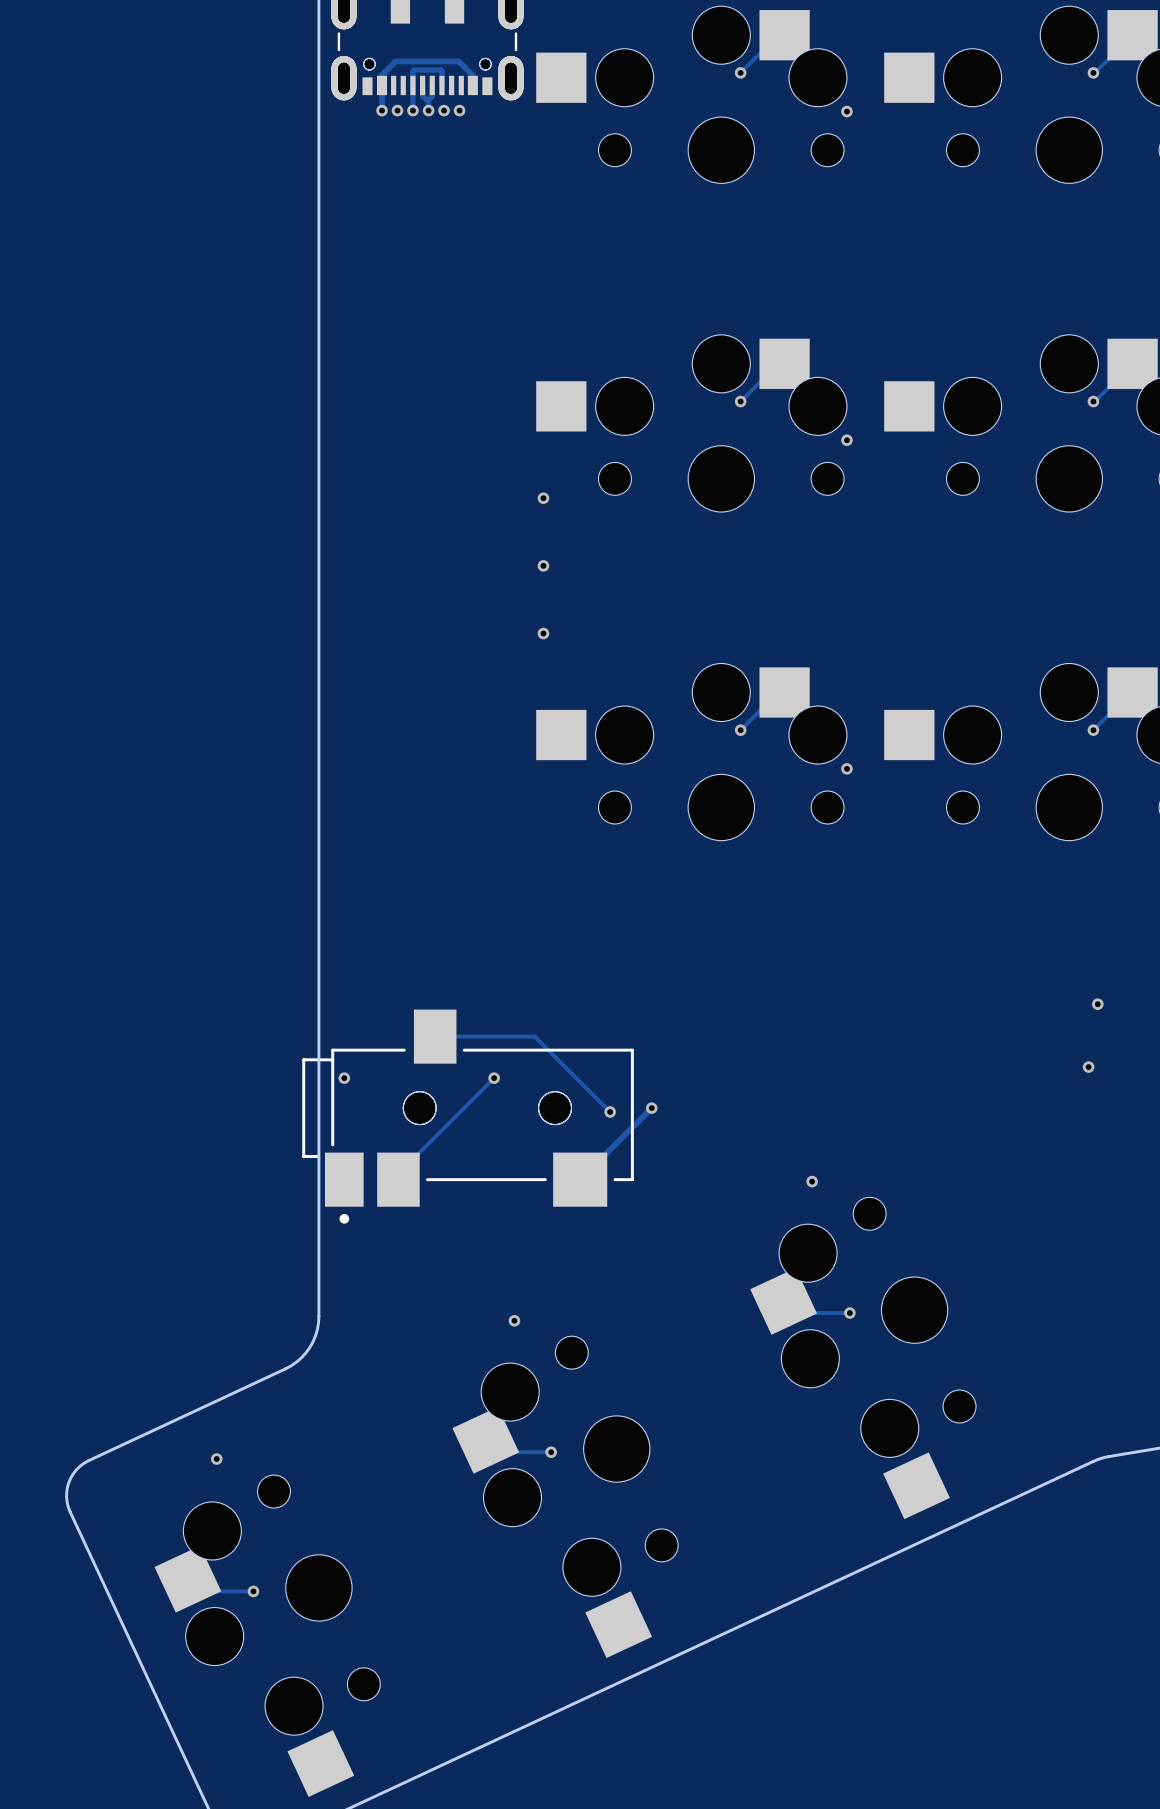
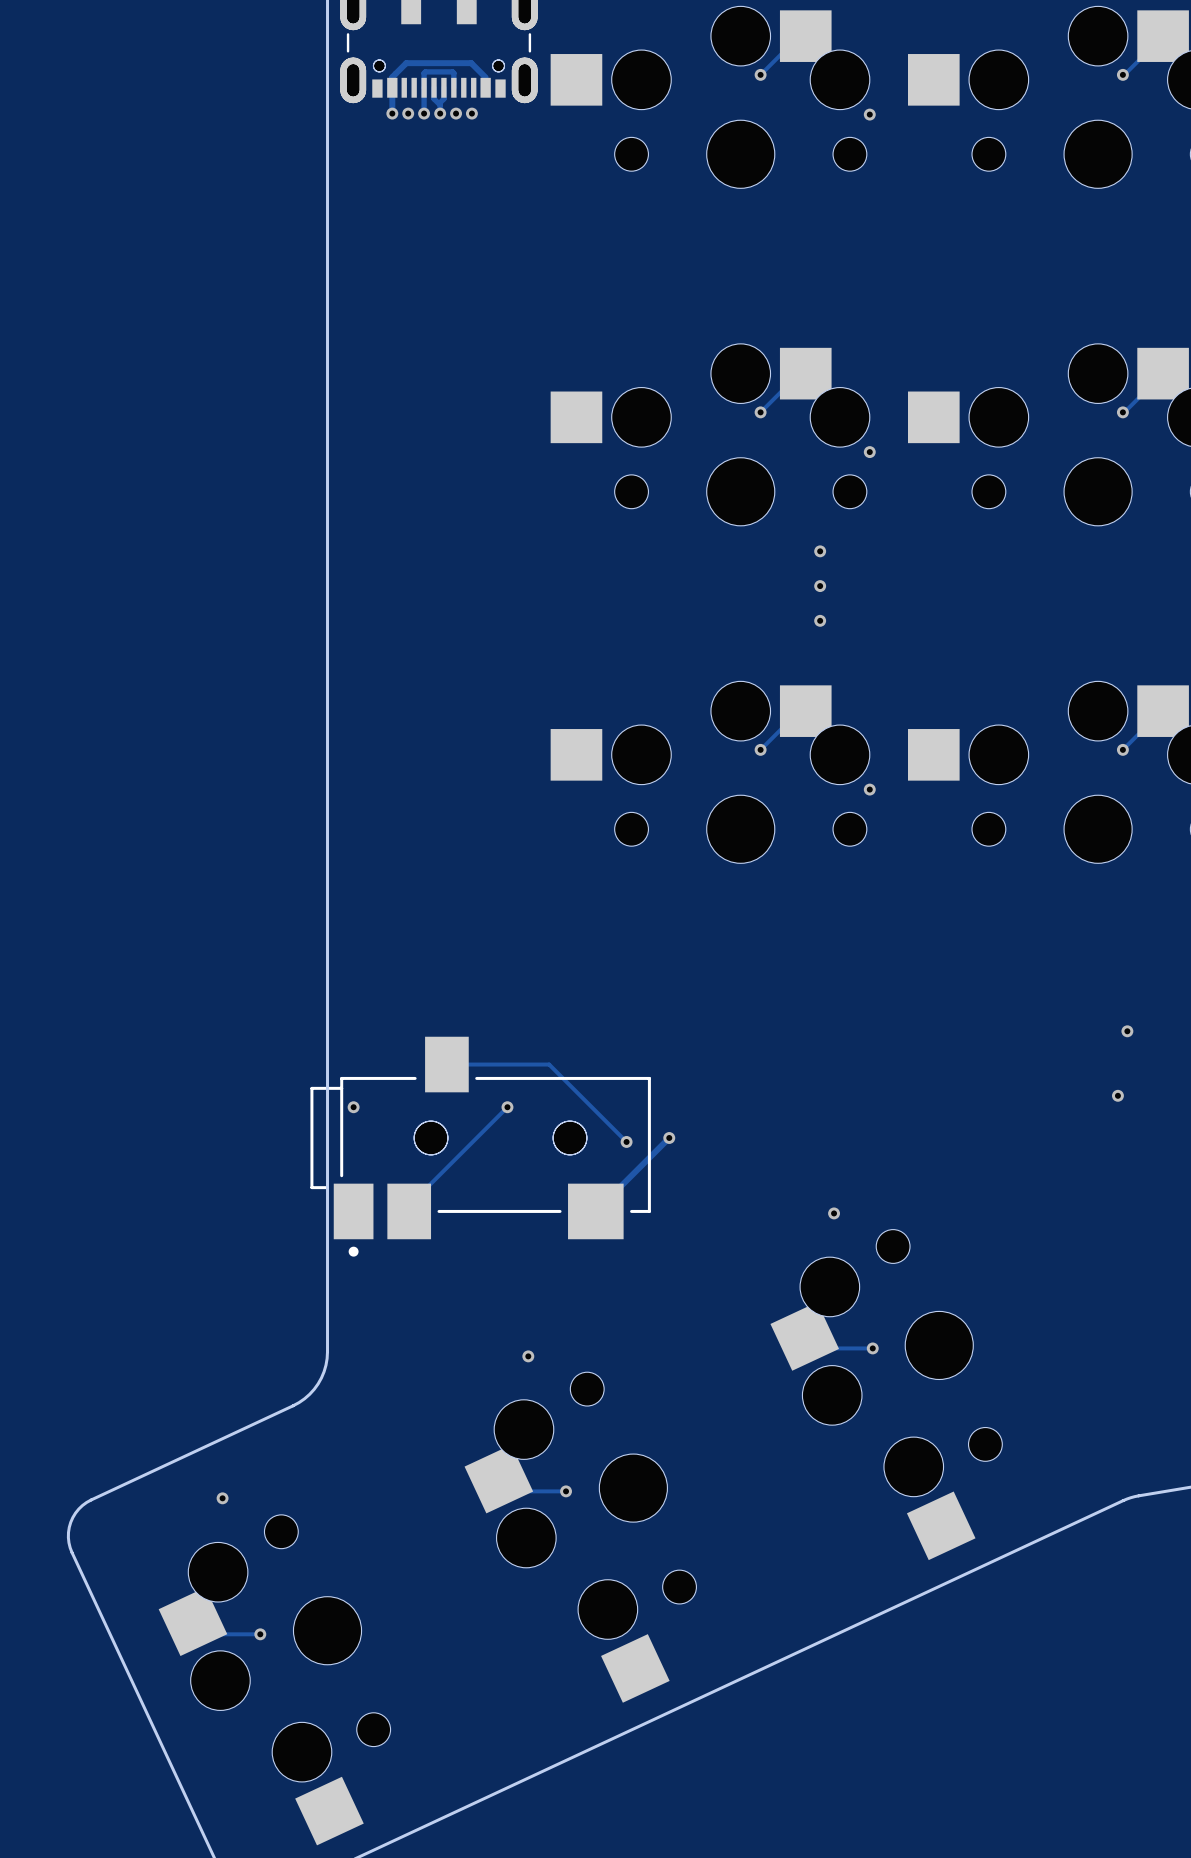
via: (543, 498) -> none
via: none -> (820, 551)
via: (543, 565) -> none
via: none -> (820, 586)
via: none -> (820, 620)
via: (543, 633) -> none

